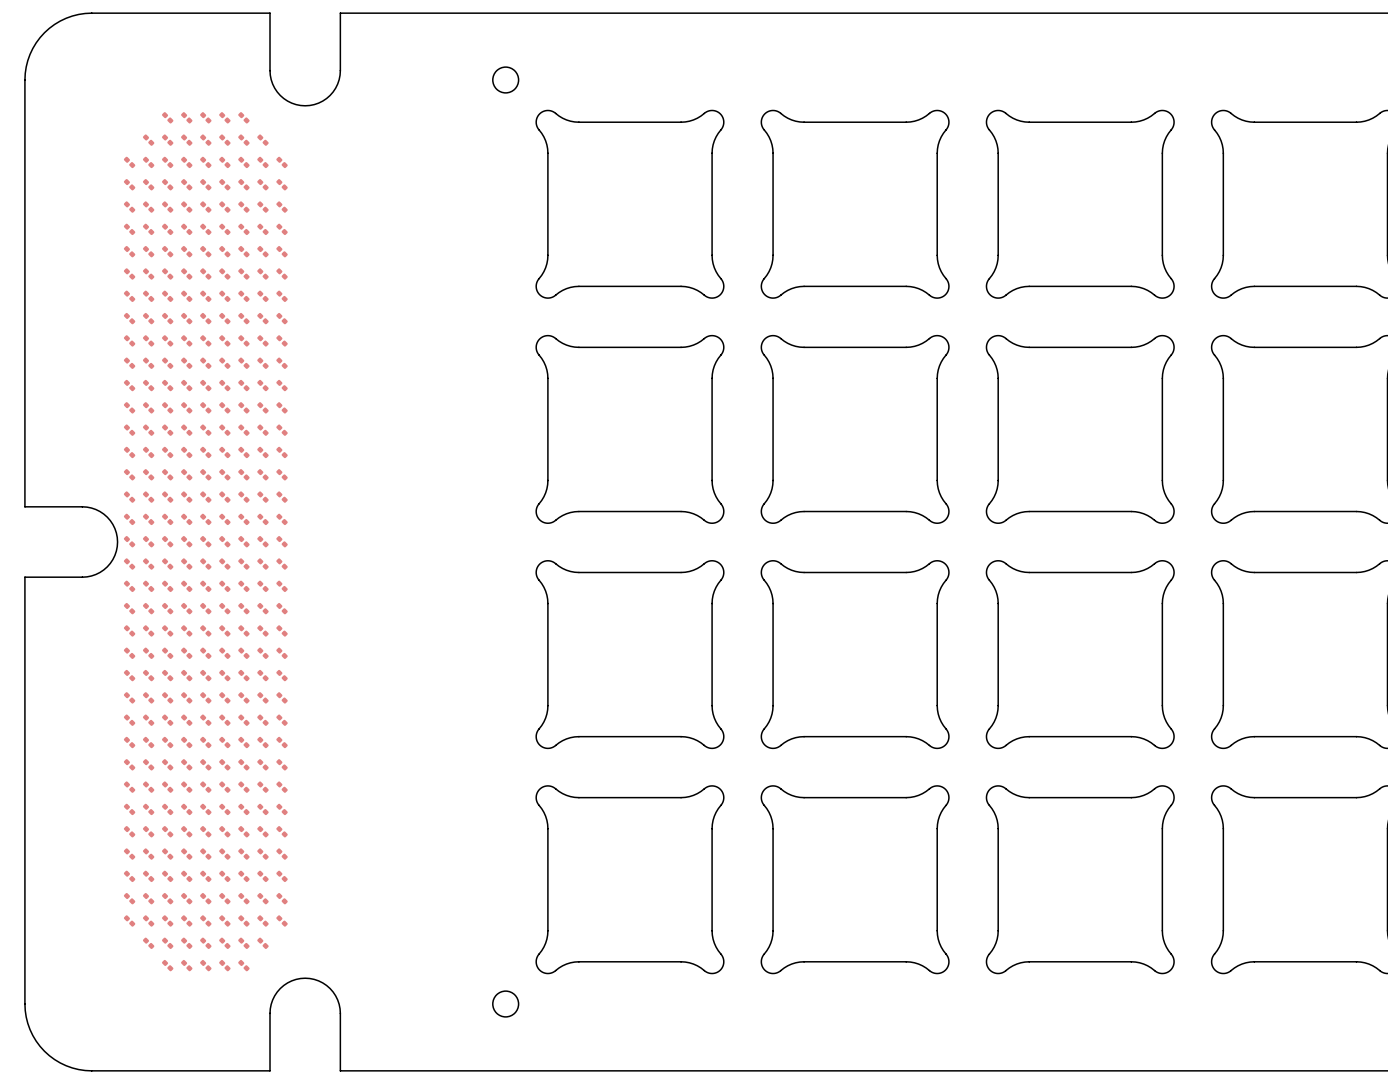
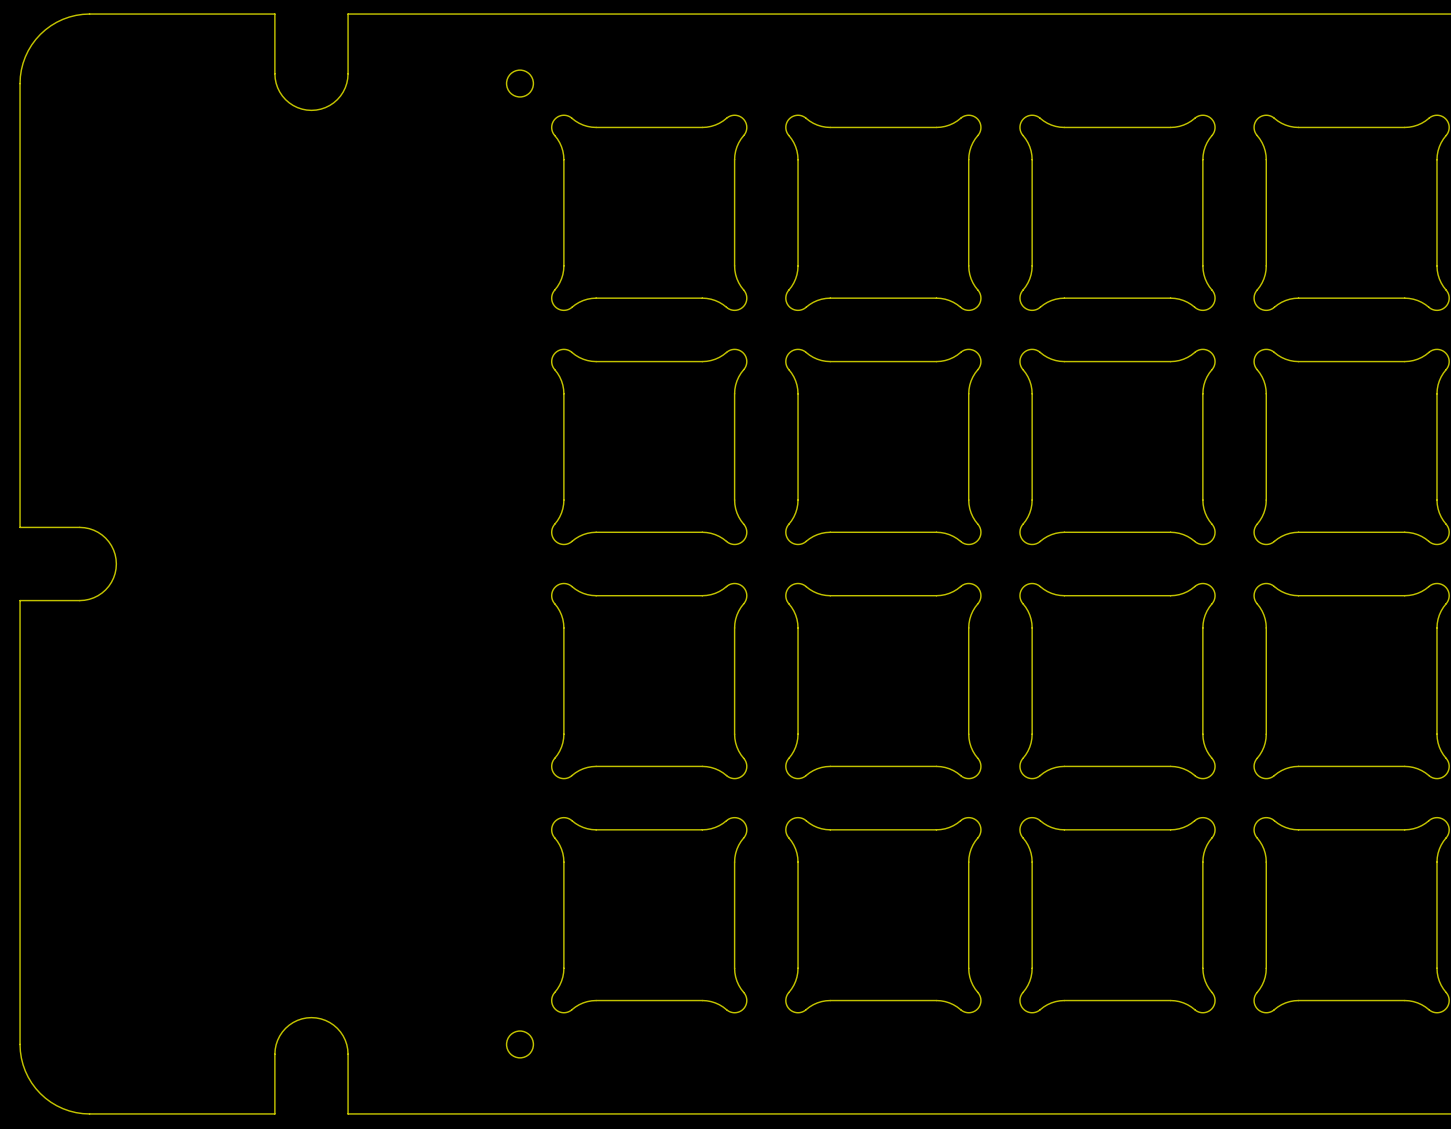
part: (167, 117) -> none
part: (186, 117) -> none
part: (205, 117) -> none
part: (224, 117) -> none
part: (243, 117) -> none
part: (148, 140) -> none
part: (167, 140) -> none
part: (186, 140) -> none
part: (205, 140) -> none
part: (224, 140) -> none
part: (243, 140) -> none
part: (262, 140) -> none
part: (129, 162) -> none
part: (148, 162) -> none
part: (167, 162) -> none
part: (186, 162) -> none
part: (205, 162) -> none
part: (224, 162) -> none
part: (243, 162) -> none
part: (262, 162) -> none
part: (282, 162) -> none
part: (129, 184) -> none
part: (148, 184) -> none
part: (167, 184) -> none
part: (186, 184) -> none
part: (205, 184) -> none
part: (224, 184) -> none
part: (243, 184) -> none
part: (262, 184) -> none
part: (282, 184) -> none
part: (129, 207) -> none
part: (148, 207) -> none
part: (167, 207) -> none
part: (186, 207) -> none
part: (205, 207) -> none
part: (224, 207) -> none
part: (243, 207) -> none
part: (262, 207) -> none
part: (282, 207) -> none
part: (129, 229) -> none
part: (148, 229) -> none
part: (167, 229) -> none
part: (186, 229) -> none
part: (205, 229) -> none
part: (224, 229) -> none
part: (243, 229) -> none
part: (262, 229) -> none
part: (282, 229) -> none
part: (129, 251) -> none
part: (148, 251) -> none
part: (167, 251) -> none
part: (186, 251) -> none
part: (205, 251) -> none
part: (224, 251) -> none
part: (243, 251) -> none
part: (262, 251) -> none
part: (282, 251) -> none
part: (129, 273) -> none
part: (148, 273) -> none
part: (167, 273) -> none
part: (186, 273) -> none
part: (205, 273) -> none
part: (224, 273) -> none
part: (243, 273) -> none
part: (262, 273) -> none
part: (282, 273) -> none
part: (129, 296) -> none
part: (148, 296) -> none
part: (167, 296) -> none
part: (186, 296) -> none
part: (205, 296) -> none
part: (224, 296) -> none
part: (243, 296) -> none
part: (262, 296) -> none
part: (282, 296) -> none
part: (129, 318) -> none
part: (148, 318) -> none
part: (167, 318) -> none
part: (186, 318) -> none
part: (205, 318) -> none
part: (224, 318) -> none
part: (243, 318) -> none
part: (262, 318) -> none
part: (282, 318) -> none
part: (129, 340) -> none
part: (148, 340) -> none
part: (167, 340) -> none
part: (186, 340) -> none
part: (205, 340) -> none
part: (224, 340) -> none
part: (243, 340) -> none
part: (262, 340) -> none
part: (282, 340) -> none
part: (129, 363) -> none
part: (148, 363) -> none
part: (167, 363) -> none
part: (186, 363) -> none
part: (205, 363) -> none
part: (224, 363) -> none
part: (243, 363) -> none
part: (262, 363) -> none
part: (282, 363) -> none
part: (129, 385) -> none
part: (148, 385) -> none
part: (167, 385) -> none
part: (186, 385) -> none
part: (205, 385) -> none
part: (224, 385) -> none
part: (243, 385) -> none
part: (262, 385) -> none
part: (282, 385) -> none
part: (129, 407) -> none
part: (148, 407) -> none
part: (167, 407) -> none
part: (186, 407) -> none
part: (205, 407) -> none
part: (224, 407) -> none
part: (243, 407) -> none
part: (262, 407) -> none
part: (282, 407) -> none
part: (129, 430) -> none
part: (148, 430) -> none
part: (167, 430) -> none
part: (186, 430) -> none
part: (205, 430) -> none
part: (224, 430) -> none
part: (243, 430) -> none
part: (262, 430) -> none
part: (282, 430) -> none
part: (129, 452) -> none
part: (148, 452) -> none
part: (167, 452) -> none
part: (186, 452) -> none
part: (205, 452) -> none
part: (224, 452) -> none
part: (243, 452) -> none
part: (262, 452) -> none
part: (282, 452) -> none
part: (129, 474) -> none
part: (148, 474) -> none
part: (167, 474) -> none
part: (186, 474) -> none
part: (205, 474) -> none
part: (224, 474) -> none
part: (243, 474) -> none
part: (262, 474) -> none
part: (282, 474) -> none
part: (129, 497) -> none
part: (148, 497) -> none
part: (167, 497) -> none
part: (186, 497) -> none
part: (205, 497) -> none
part: (224, 497) -> none
part: (243, 497) -> none
part: (262, 497) -> none
part: (282, 497) -> none
part: (129, 519) -> none
part: (148, 519) -> none
part: (167, 519) -> none
part: (186, 519) -> none
part: (205, 519) -> none
part: (224, 519) -> none
part: (243, 519) -> none
part: (262, 519) -> none
part: (282, 519) -> none
part: (129, 541) -> none
part: (148, 541) -> none
part: (167, 541) -> none
part: (186, 541) -> none
part: (205, 541) -> none
part: (224, 541) -> none
part: (243, 541) -> none
part: (262, 541) -> none
part: (282, 541) -> none
part: (129, 564) -> none
part: (148, 564) -> none
part: (167, 564) -> none
part: (186, 564) -> none
part: (205, 564) -> none
part: (224, 564) -> none
part: (243, 564) -> none
part: (262, 564) -> none
part: (282, 564) -> none
part: (129, 586) -> none
part: (148, 586) -> none
part: (167, 586) -> none
part: (186, 586) -> none
part: (205, 586) -> none
part: (224, 586) -> none
part: (243, 586) -> none
part: (262, 586) -> none
part: (282, 586) -> none
part: (129, 608) -> none
part: (148, 608) -> none
part: (167, 608) -> none
part: (186, 608) -> none
part: (205, 608) -> none
part: (224, 608) -> none
part: (243, 608) -> none
part: (262, 608) -> none
part: (282, 608) -> none
part: (129, 630) -> none
part: (148, 630) -> none
part: (167, 630) -> none
part: (186, 630) -> none
part: (205, 630) -> none
part: (224, 630) -> none
part: (243, 630) -> none
part: (262, 630) -> none
part: (282, 630) -> none
part: (129, 653) -> none
part: (148, 653) -> none
part: (167, 653) -> none
part: (186, 653) -> none
part: (205, 653) -> none
part: (224, 653) -> none
part: (243, 653) -> none
part: (262, 653) -> none
part: (282, 653) -> none
part: (129, 675) -> none
part: (148, 675) -> none
part: (167, 675) -> none
part: (186, 675) -> none
part: (205, 675) -> none
part: (224, 675) -> none
part: (243, 675) -> none
part: (262, 675) -> none
part: (282, 675) -> none
part: (129, 697) -> none
part: (148, 697) -> none
part: (167, 697) -> none
part: (186, 697) -> none
part: (205, 697) -> none
part: (224, 697) -> none
part: (243, 697) -> none
part: (262, 697) -> none
part: (282, 697) -> none
part: (129, 720) -> none
part: (148, 720) -> none
part: (167, 720) -> none
part: (186, 720) -> none
part: (205, 720) -> none
part: (224, 720) -> none
part: (243, 720) -> none
part: (262, 720) -> none
part: (282, 720) -> none
part: (129, 742) -> none
part: (148, 742) -> none
part: (167, 742) -> none
part: (186, 742) -> none
part: (205, 742) -> none
part: (224, 742) -> none
part: (243, 742) -> none
part: (262, 742) -> none
part: (282, 742) -> none
part: (129, 764) -> none
part: (148, 764) -> none
part: (167, 764) -> none
part: (186, 764) -> none
part: (205, 764) -> none
part: (224, 764) -> none
part: (243, 764) -> none
part: (262, 764) -> none
part: (282, 764) -> none
part: (129, 787) -> none
part: (148, 787) -> none
part: (167, 787) -> none
part: (186, 787) -> none
part: (205, 787) -> none
part: (224, 787) -> none
part: (243, 787) -> none
part: (262, 787) -> none
part: (282, 787) -> none
part: (129, 809) -> none
part: (148, 809) -> none
part: (167, 809) -> none
part: (186, 809) -> none
part: (205, 809) -> none
part: (224, 809) -> none
part: (243, 809) -> none
part: (262, 809) -> none
part: (282, 809) -> none
part: (129, 831) -> none
part: (148, 831) -> none
part: (167, 831) -> none
part: (186, 831) -> none
part: (205, 831) -> none
part: (224, 831) -> none
part: (243, 831) -> none
part: (262, 831) -> none
part: (282, 831) -> none
part: (129, 854) -> none
part: (148, 854) -> none
part: (167, 854) -> none
part: (186, 854) -> none
part: (205, 854) -> none
part: (224, 854) -> none
part: (243, 854) -> none
part: (262, 854) -> none
part: (282, 854) -> none
part: (129, 876) -> none
part: (148, 876) -> none
part: (167, 876) -> none
part: (186, 876) -> none
part: (205, 876) -> none
part: (224, 876) -> none
part: (243, 876) -> none
part: (262, 876) -> none
part: (282, 876) -> none
part: (129, 898) -> none
part: (148, 898) -> none
part: (167, 898) -> none
part: (186, 898) -> none
part: (205, 898) -> none
part: (224, 898) -> none
part: (243, 898) -> none
part: (262, 898) -> none
part: (282, 898) -> none
part: (129, 920) -> none
part: (148, 920) -> none
part: (167, 920) -> none
part: (186, 920) -> none
part: (205, 920) -> none
part: (224, 920) -> none
part: (243, 920) -> none
part: (262, 920) -> none
part: (282, 920) -> none
part: (148, 943) -> none
part: (167, 943) -> none
part: (186, 943) -> none
part: (205, 943) -> none
part: (224, 943) -> none
part: (243, 943) -> none
part: (262, 943) -> none
part: (167, 965) -> none
part: (186, 965) -> none
part: (205, 965) -> none
part: (224, 965) -> none
part: (243, 965) -> none

